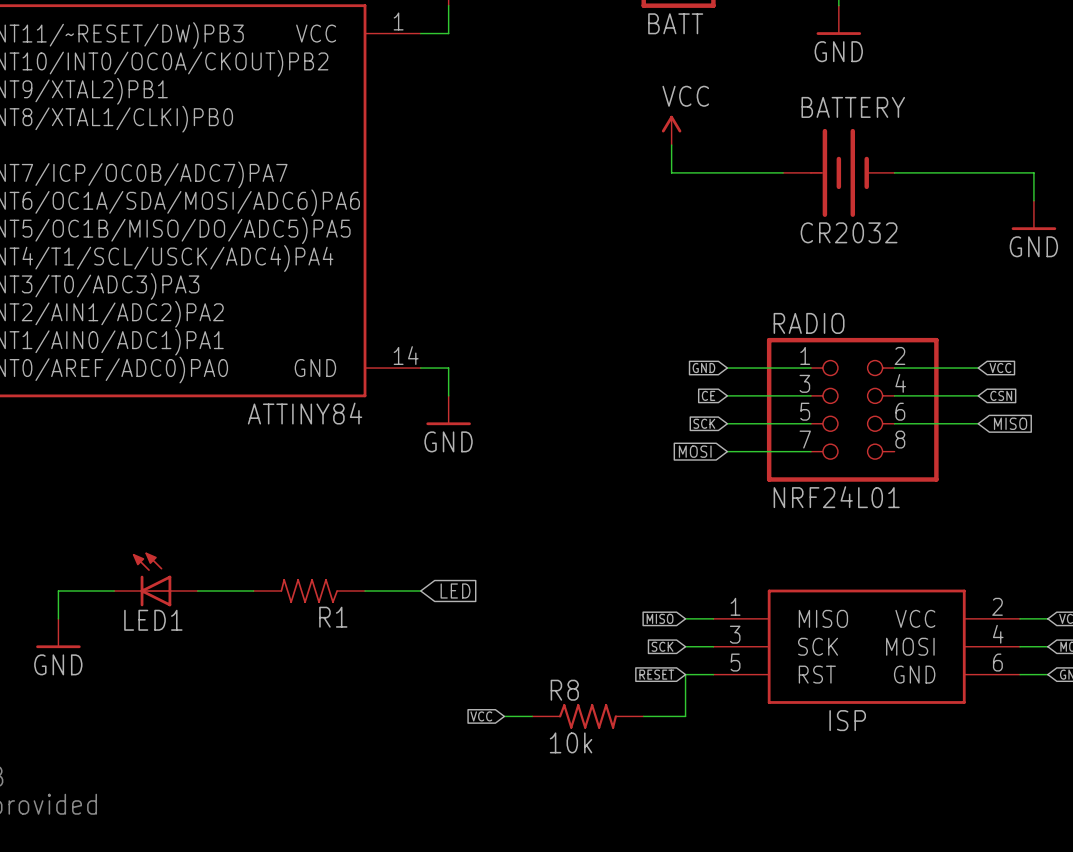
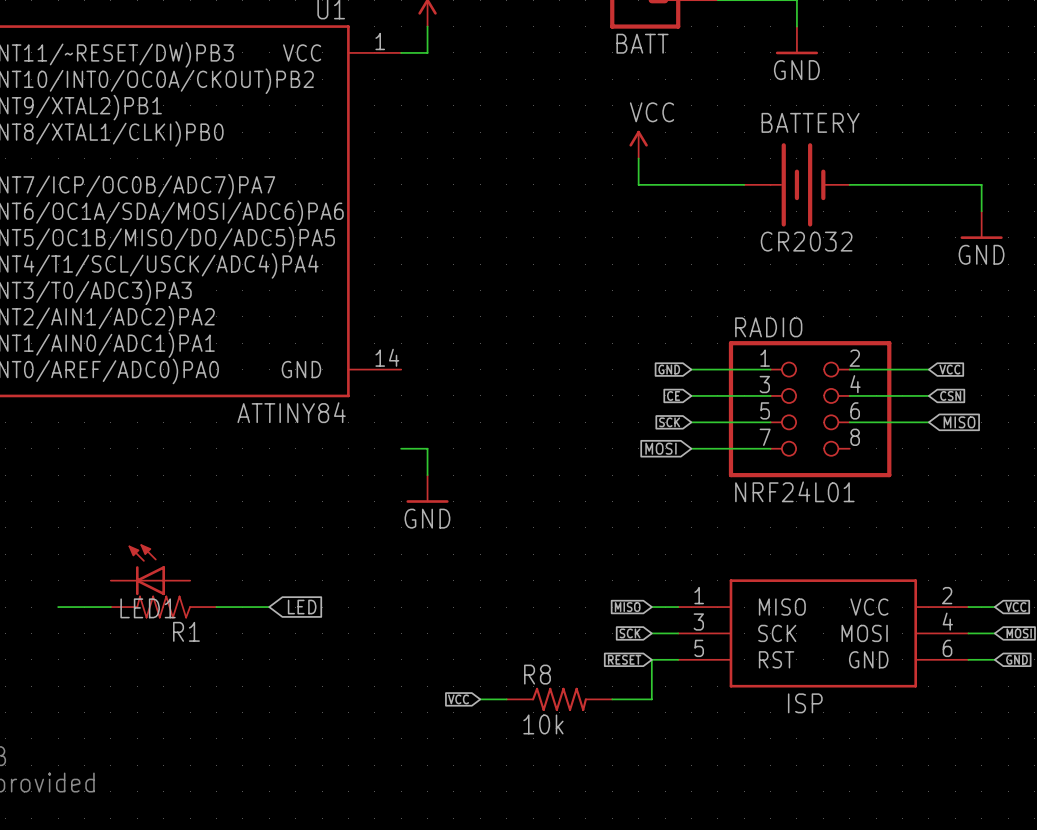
wire: (420, 368) (448, 368) (448, 395) -> (401, 448) (427, 448) (427, 475)
power symbol position: GND (448, 410) -> GND (427, 488)
wire: (114, 590) (58, 590) (58, 618) -> (110, 607) (58, 607)
wire: (197, 590) (253, 590) -> none
R1 position: (309, 590) -> (163, 607)
wire: (365, 590) (420, 590) -> (216, 607) (269, 607)
global label position: LED (455, 590) -> LED (302, 607)
power symbol: GND (58, 633) -> none

